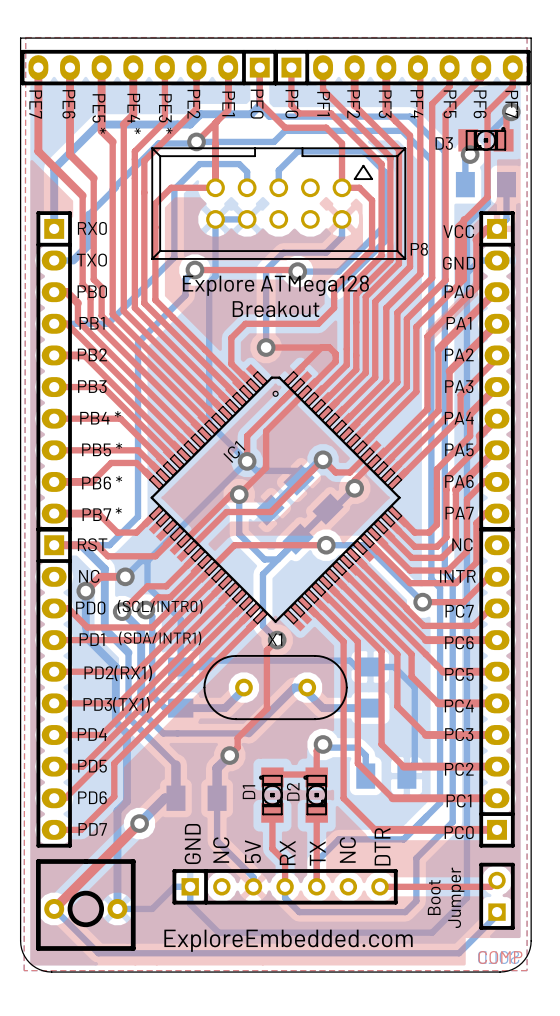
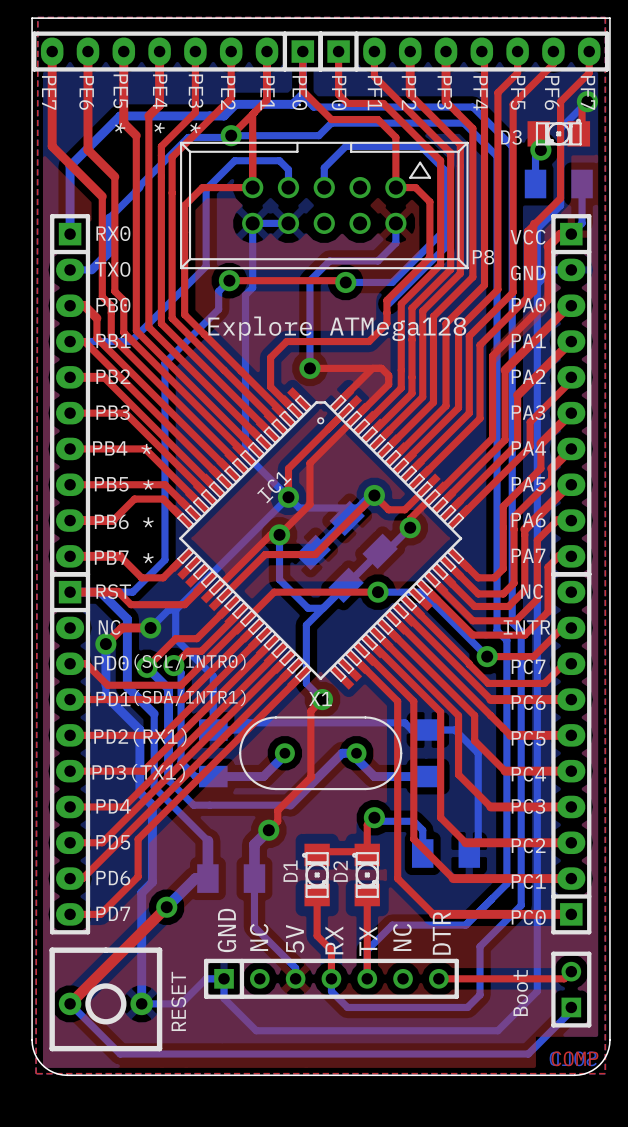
text position: Explore ATMega128 (275, 285) -> Explore ATMega128 (337, 328)
text: Breakout (276, 309) -> none
text: Boot (434, 897) -> none
text: Jumper (456, 897) -> Boot (520, 993)
part value: none -> RESET (178, 1001)
text: ExploreEmbedded.com (288, 940) -> none

